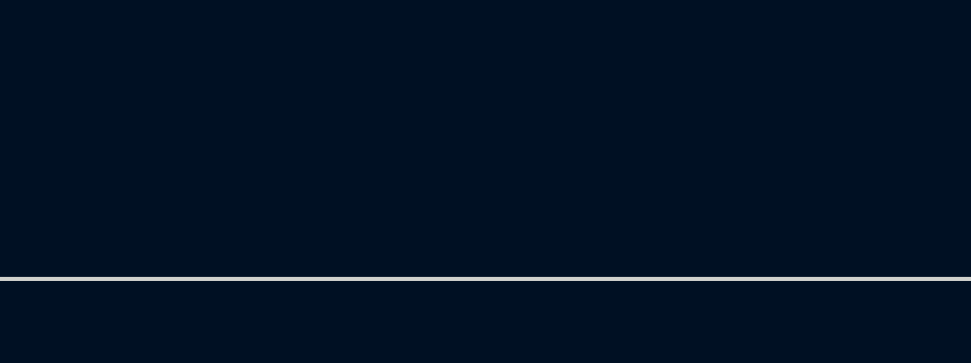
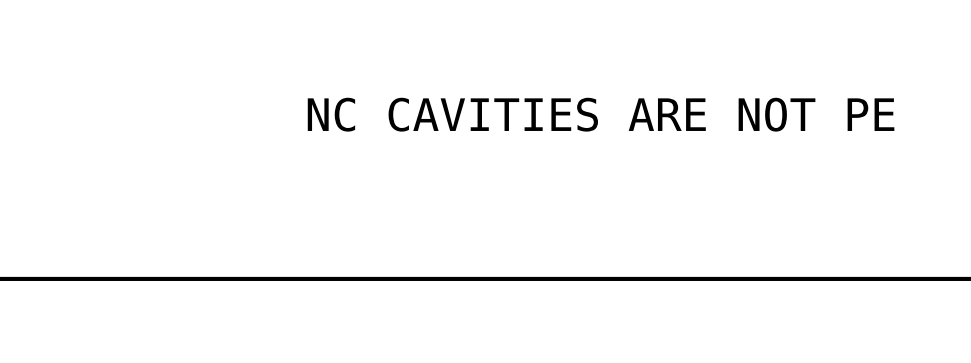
text: none -> NC CAVITIES ARE NOT PE (601, 114)

